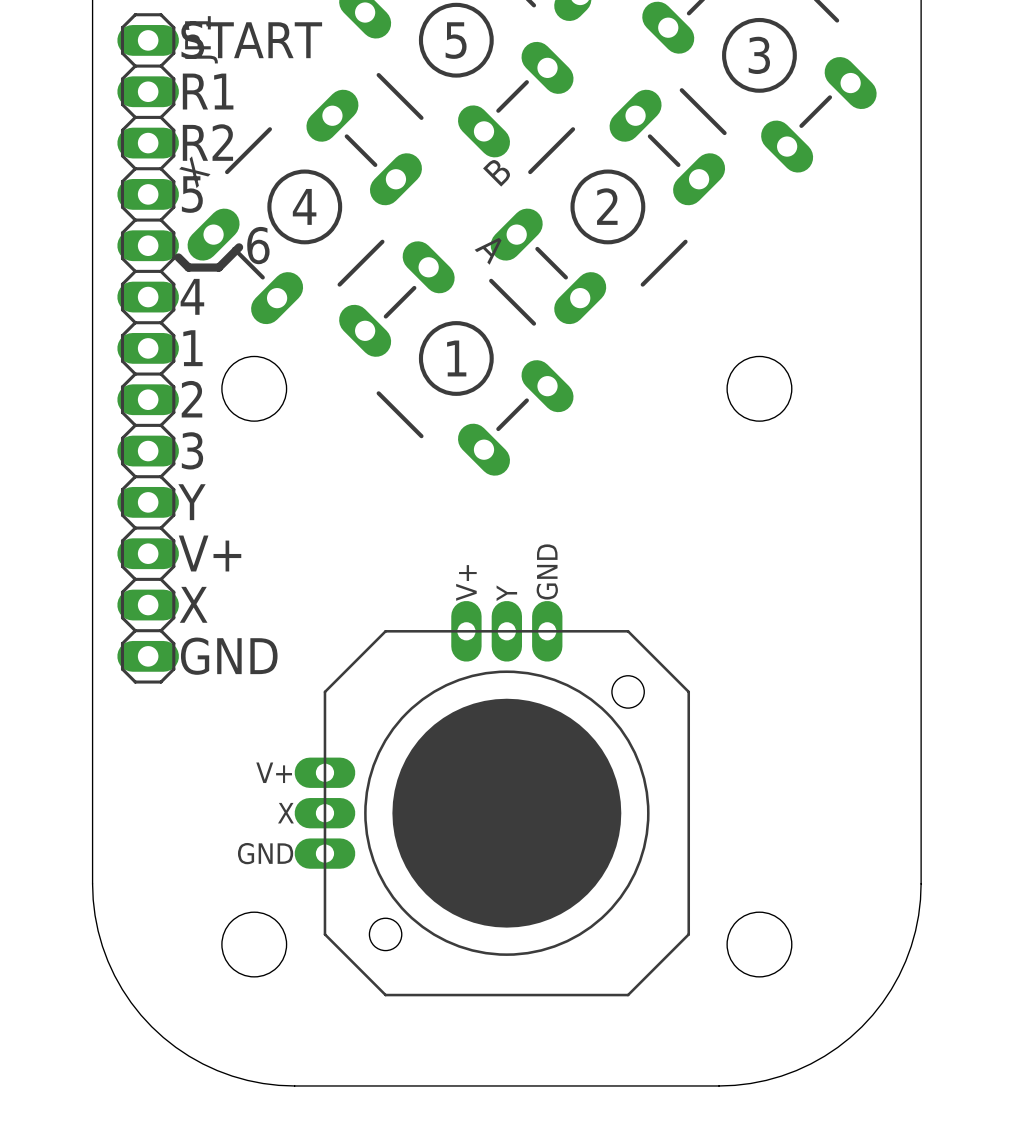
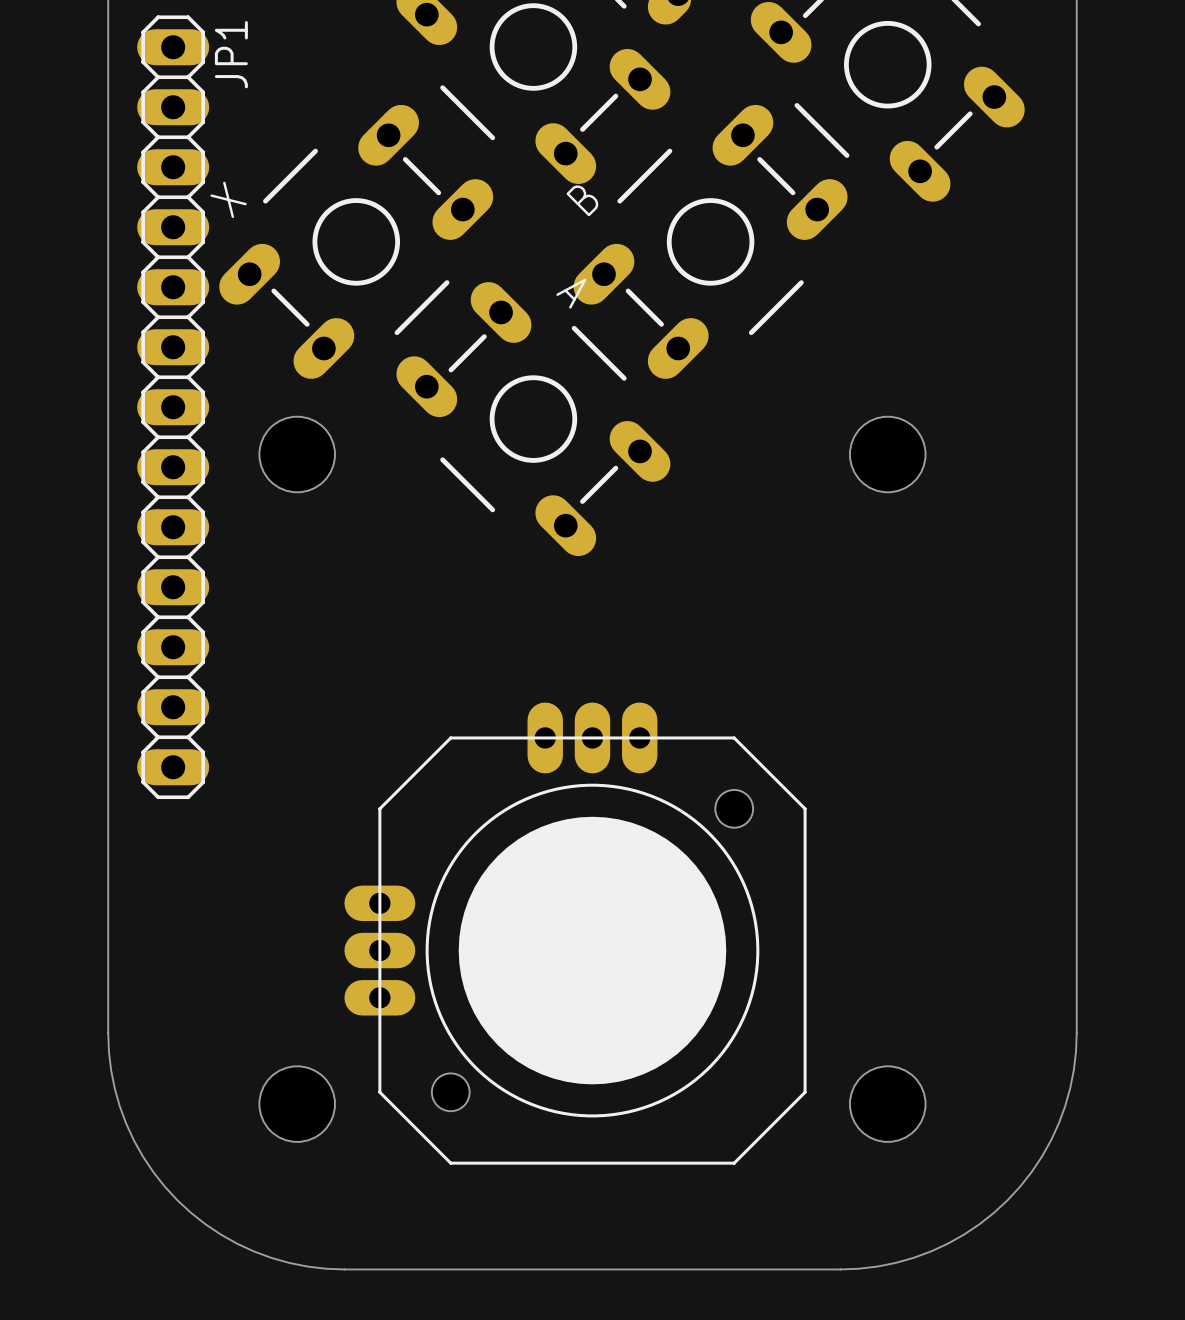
text: START (251, 40) -> none
text: 5 (456, 40) -> none
text: 3 (759, 55) -> none
text: R1 (208, 91) -> none
text: R2 (207, 142) -> none
text: 5 (192, 194) -> none
text: 4 (304, 206) -> none
text: 2 (607, 206) -> none
text: 6 (258, 245) -> none
line: (239, 247) (218, 267) (188, 267) (178, 257) -> none
text: 4 (192, 296) -> none
text: 1 (192, 348) -> none
text: 1 (456, 358) -> none
text: 2 (191, 399) -> none
text: 3 (192, 450) -> none
text: Y (192, 502) -> none
text: V+ (210, 553) -> none
text: GND (547, 571) -> none
text: V+ (466, 582) -> none
text: Y (506, 593) -> none
text: X (193, 604) -> none
text: GND (229, 656) -> none
text: V+ (274, 772) -> none
text: X (285, 813) -> none
text: GND (265, 853) -> none

